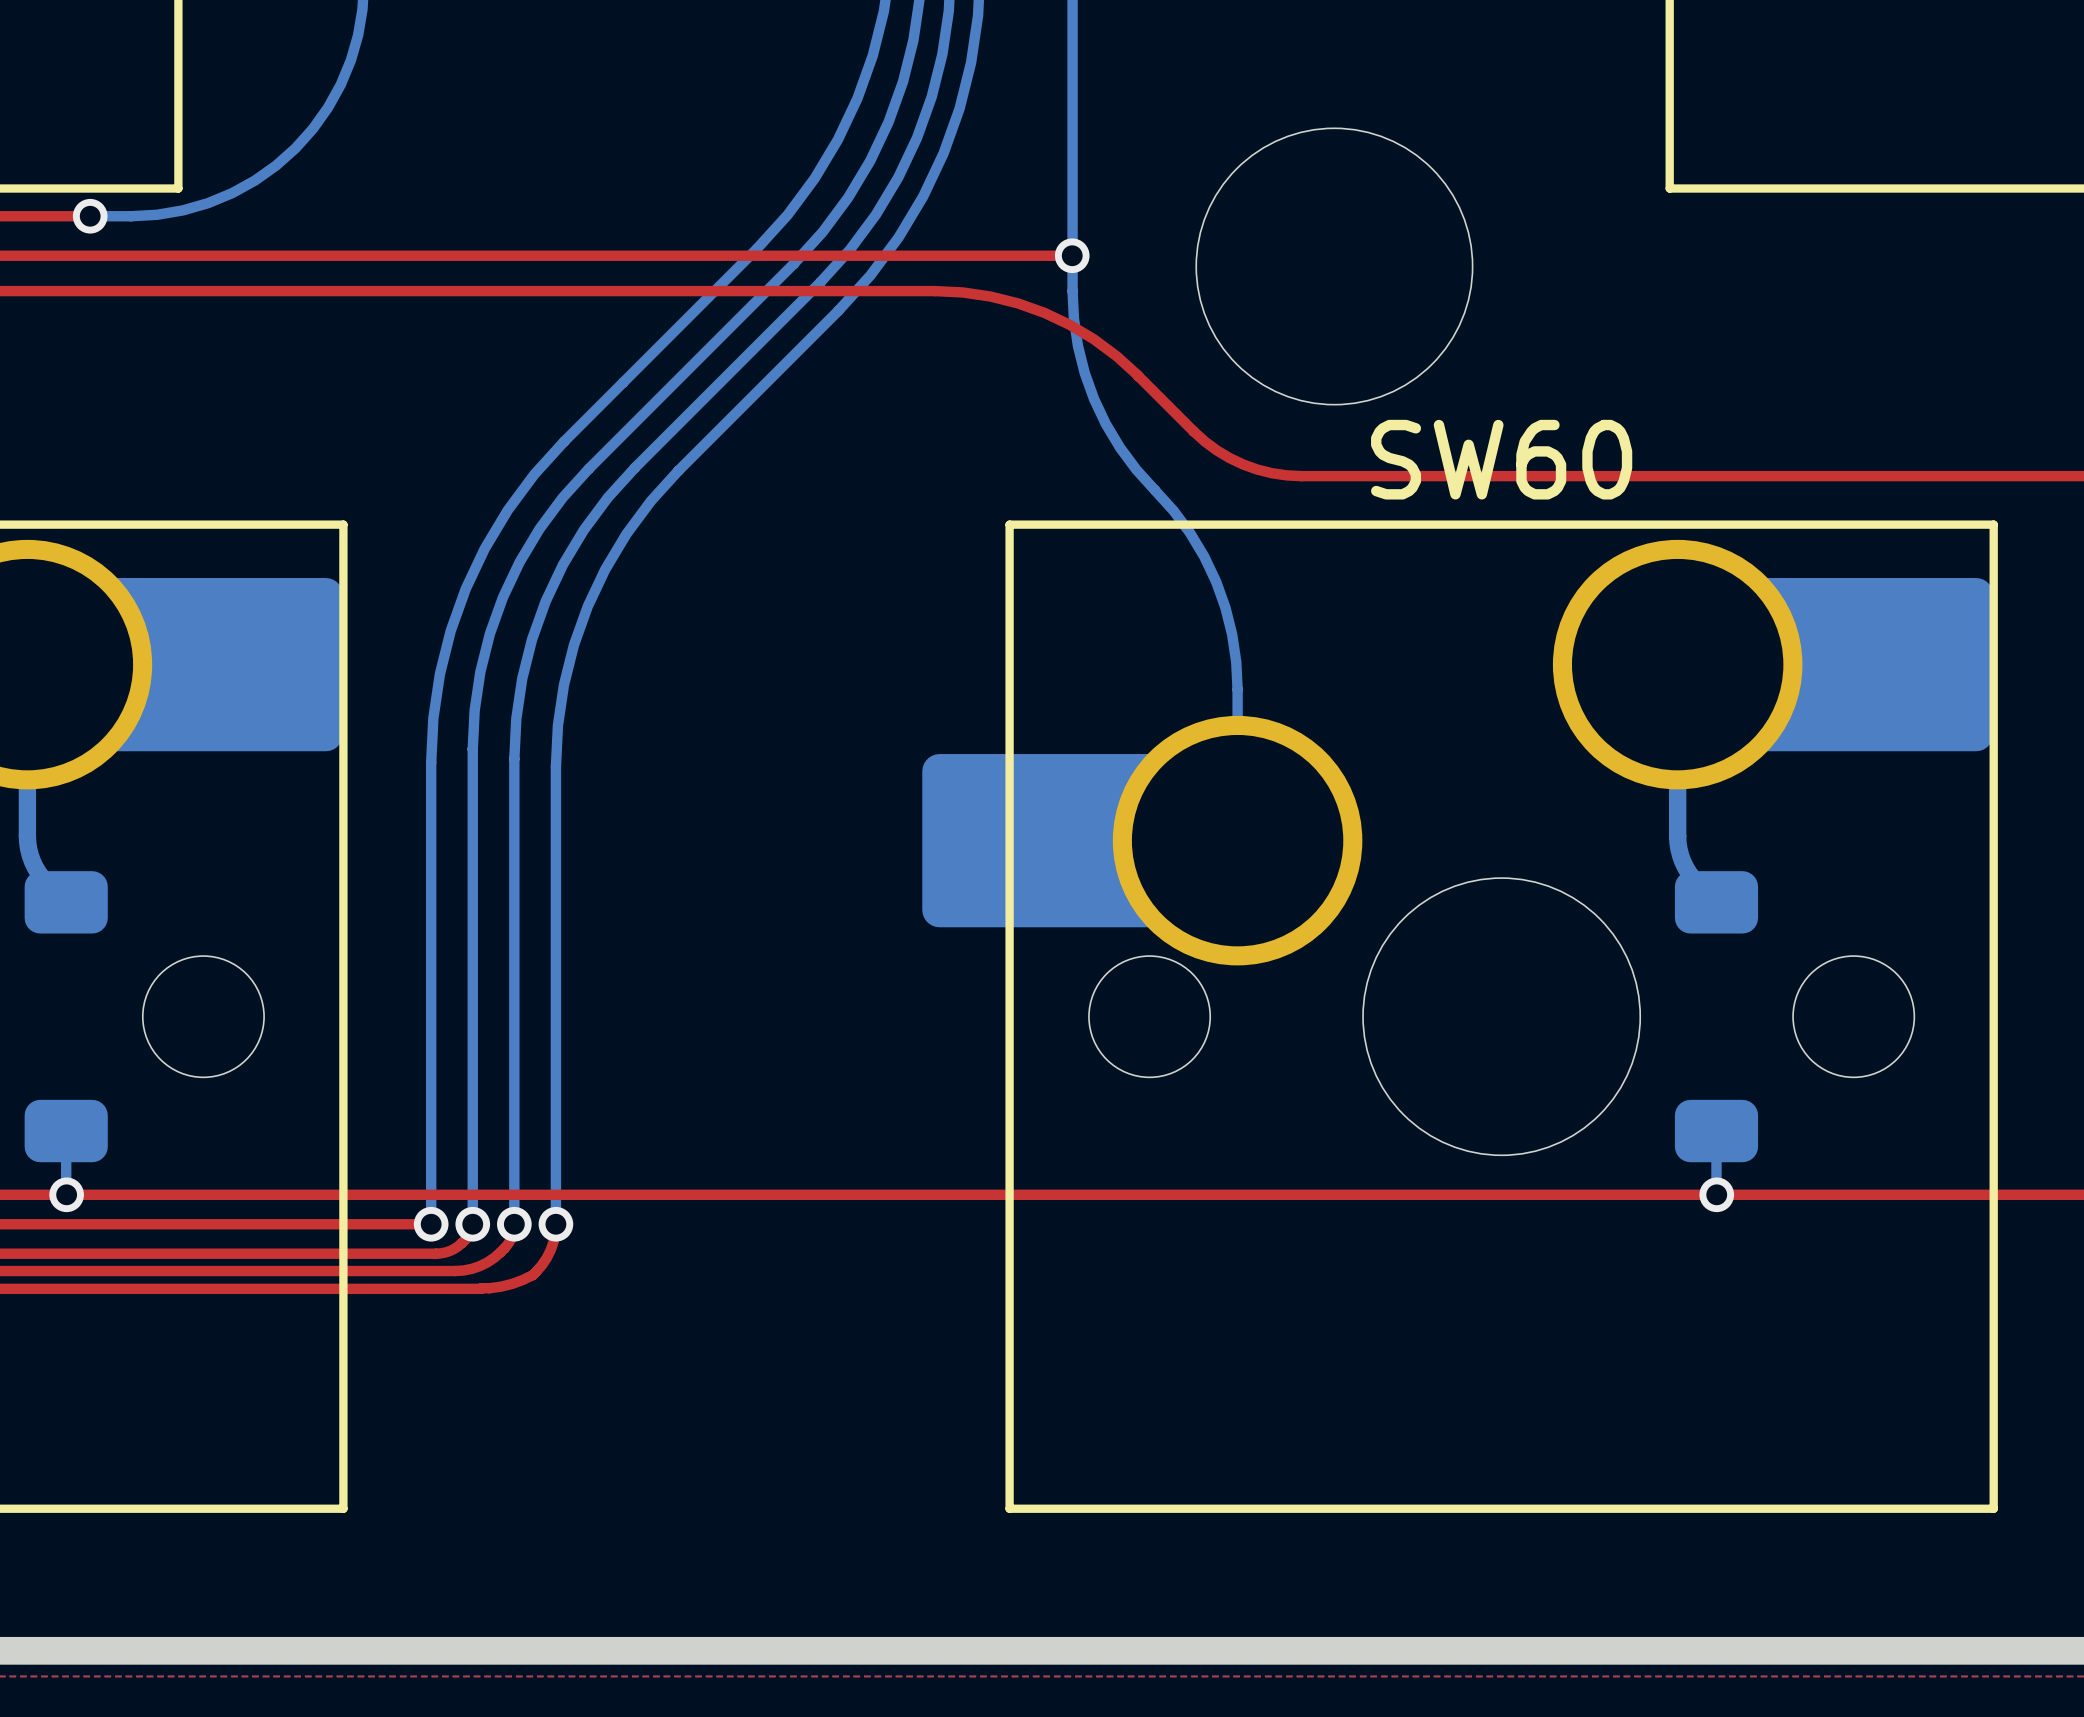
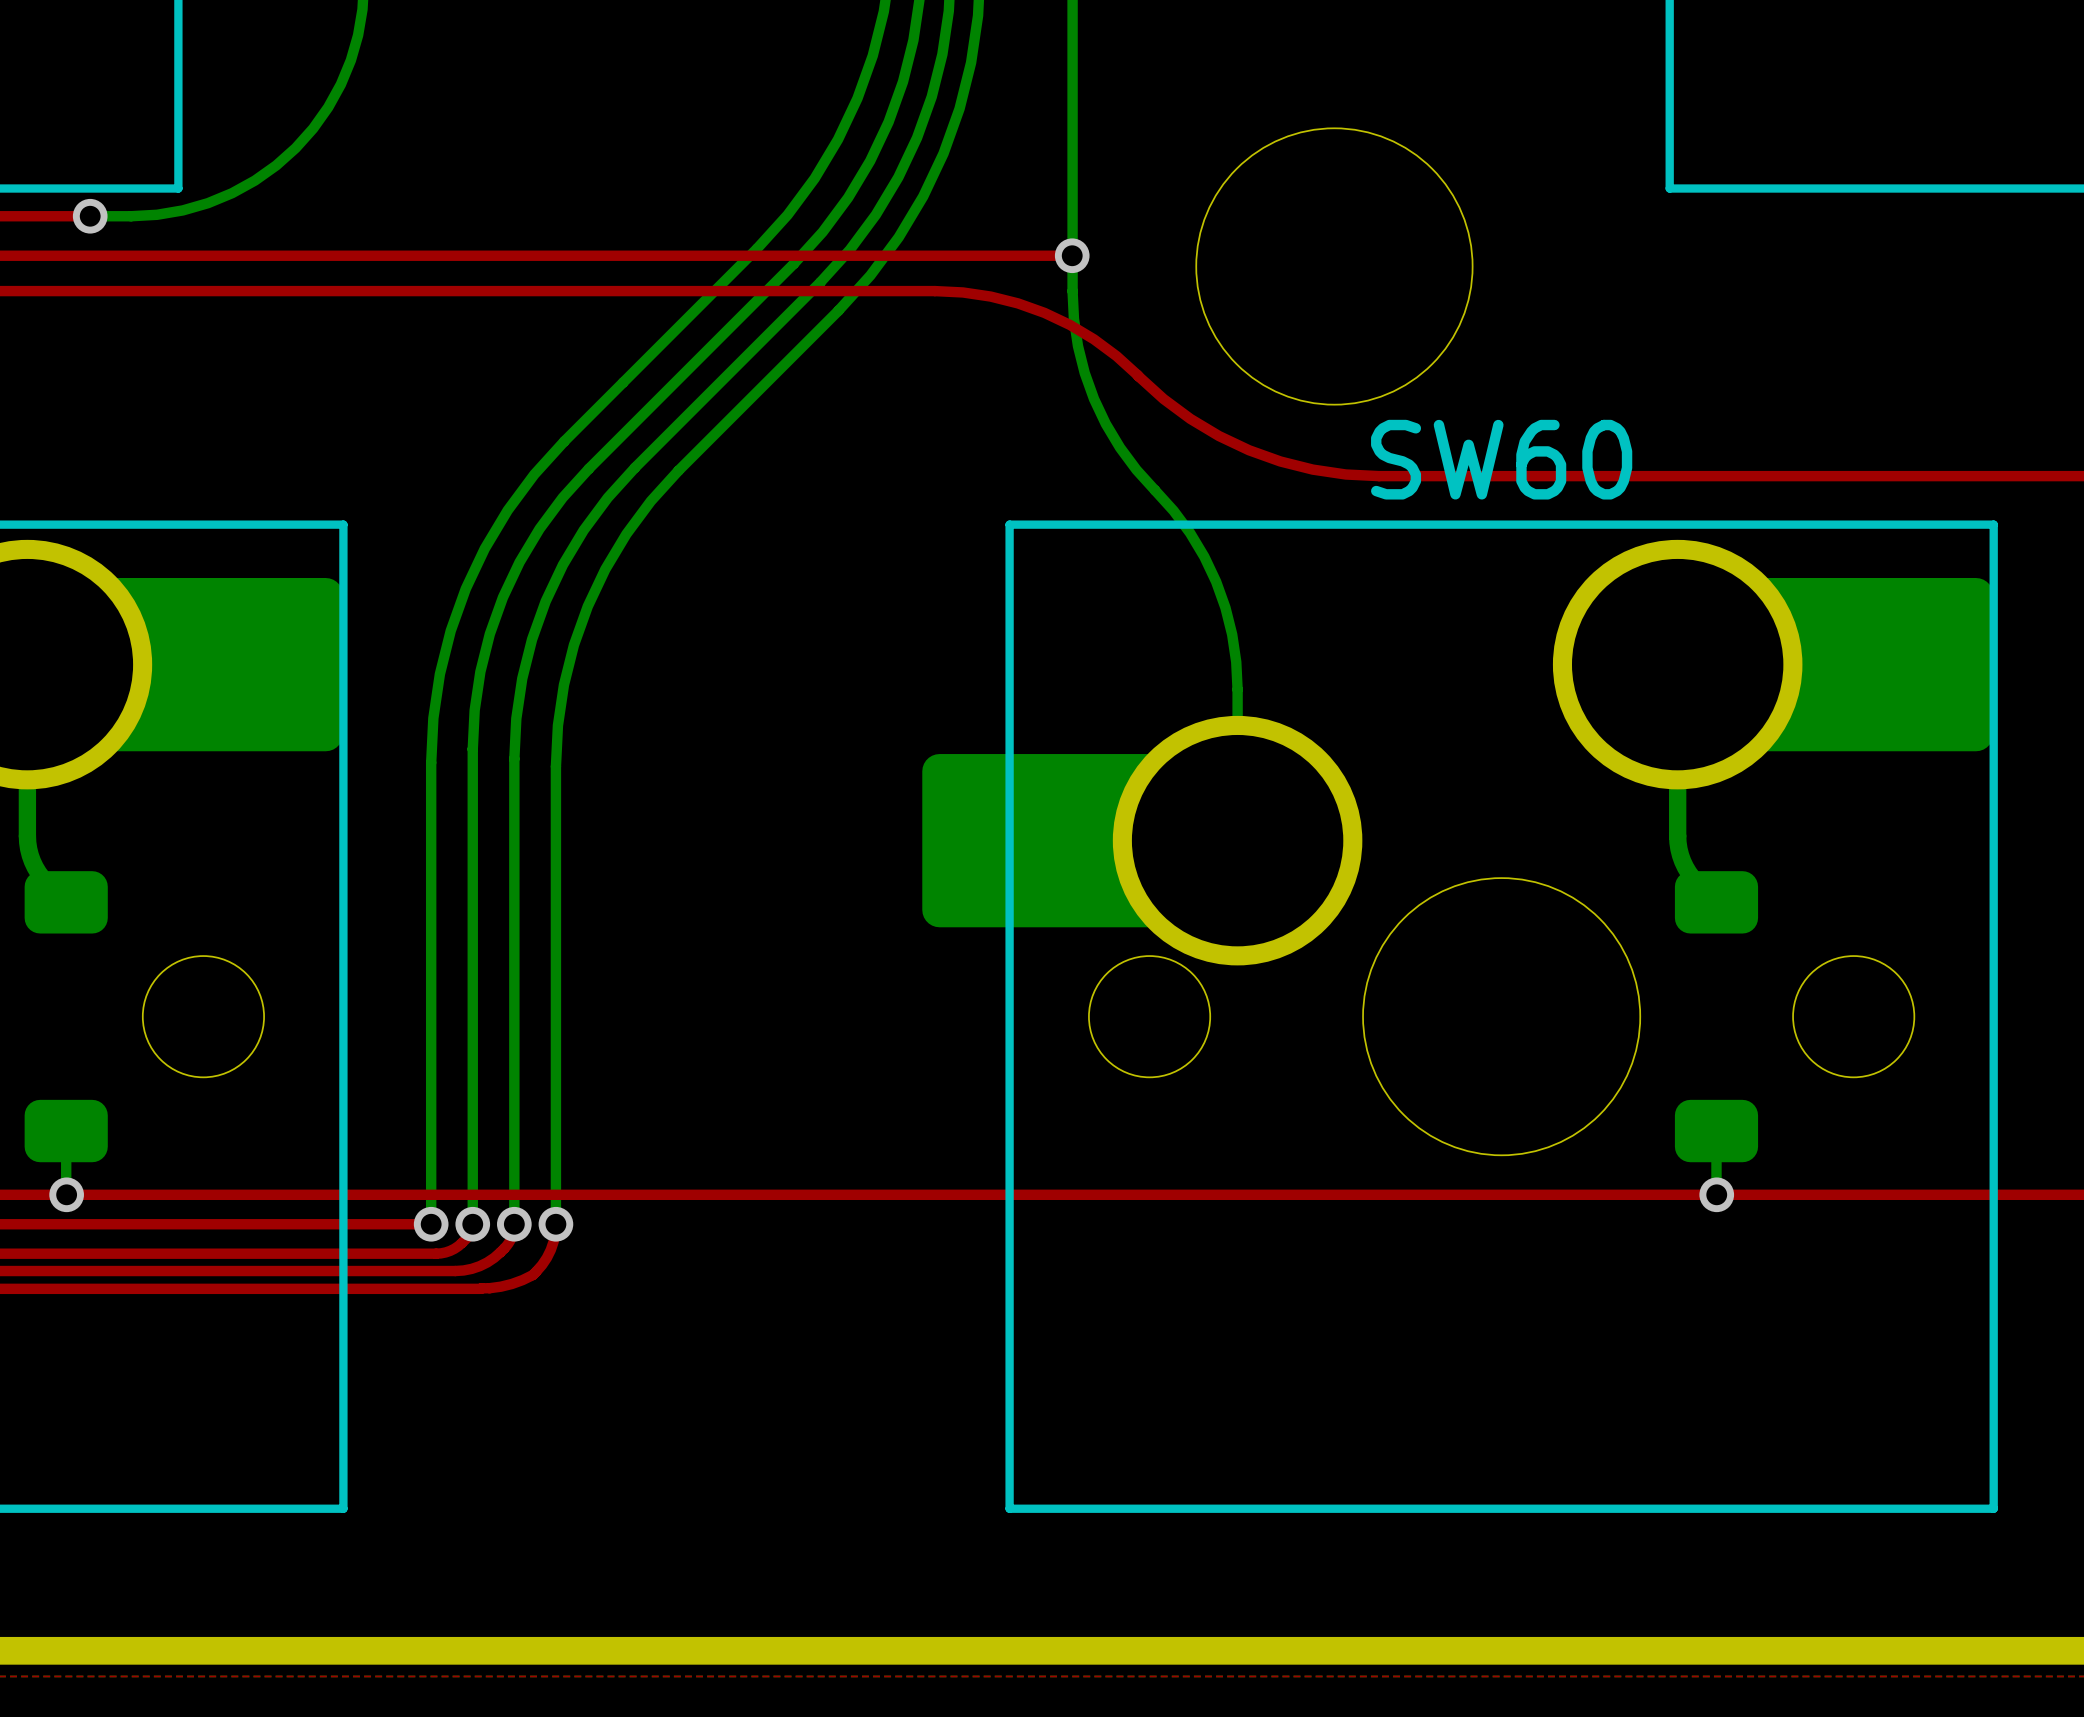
top track: (1138, 376) (1204, 441) (1243, 464) (1286, 475) (1379, 476) -> (1138, 376) (1163, 399) (1190, 418) (1219, 436) (1249, 450) (1280, 461) (1312, 469) (1345, 474) (1379, 476)

